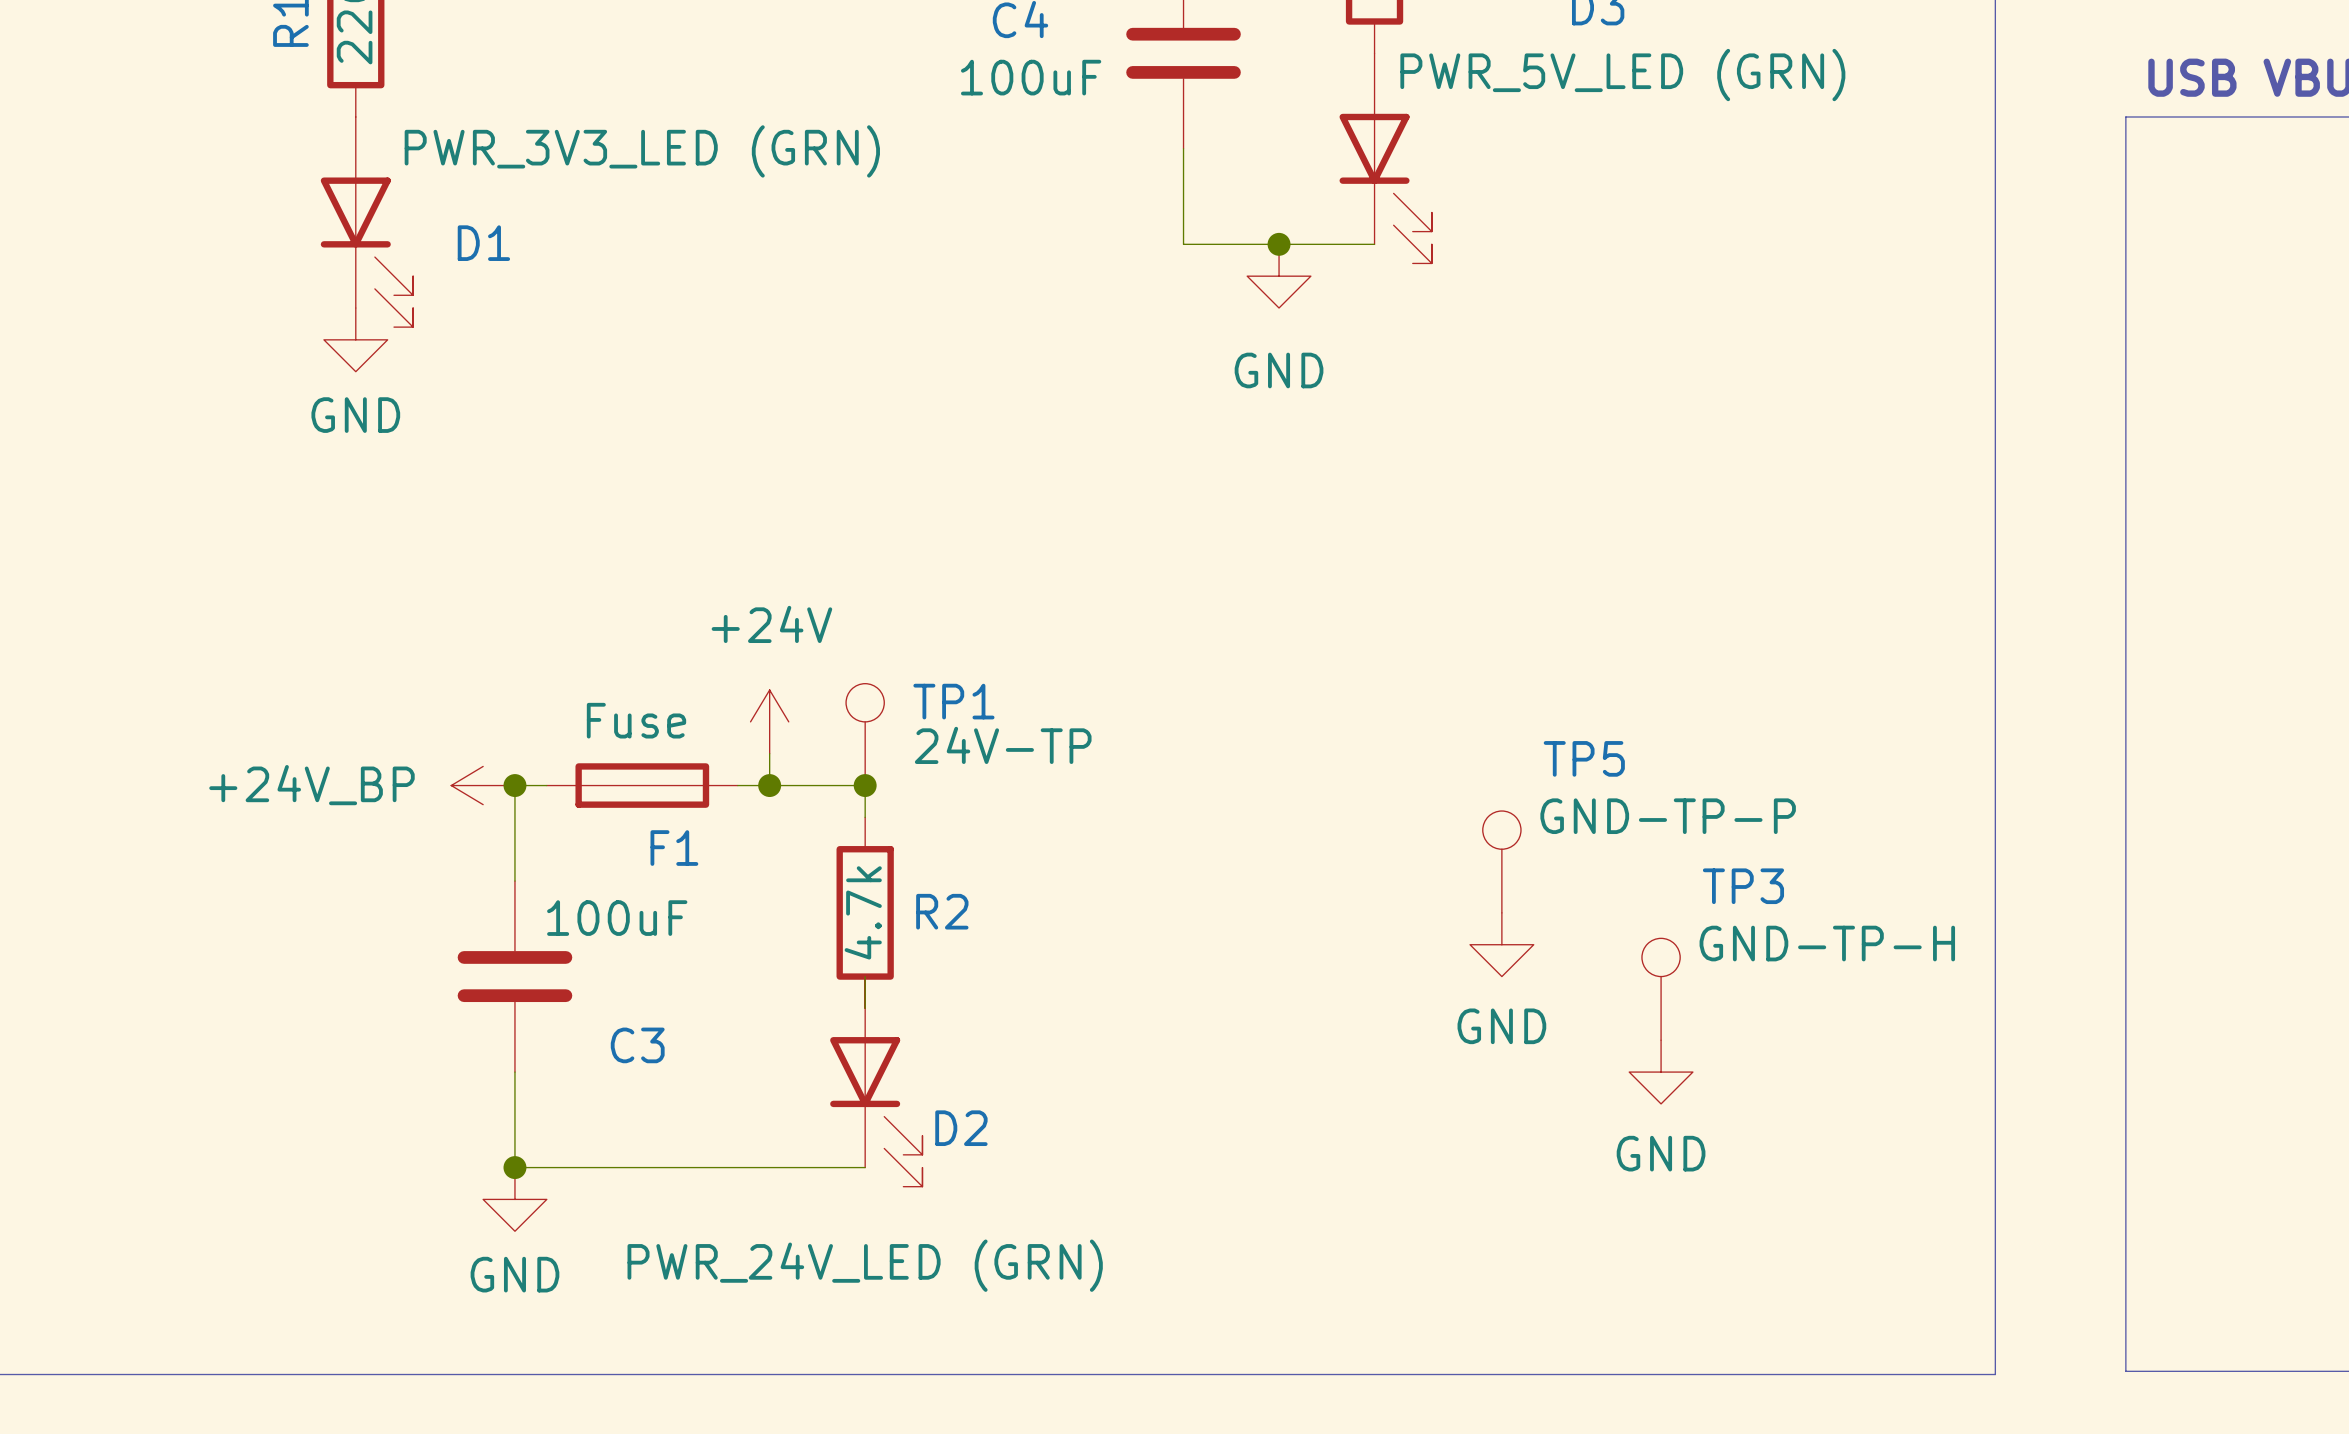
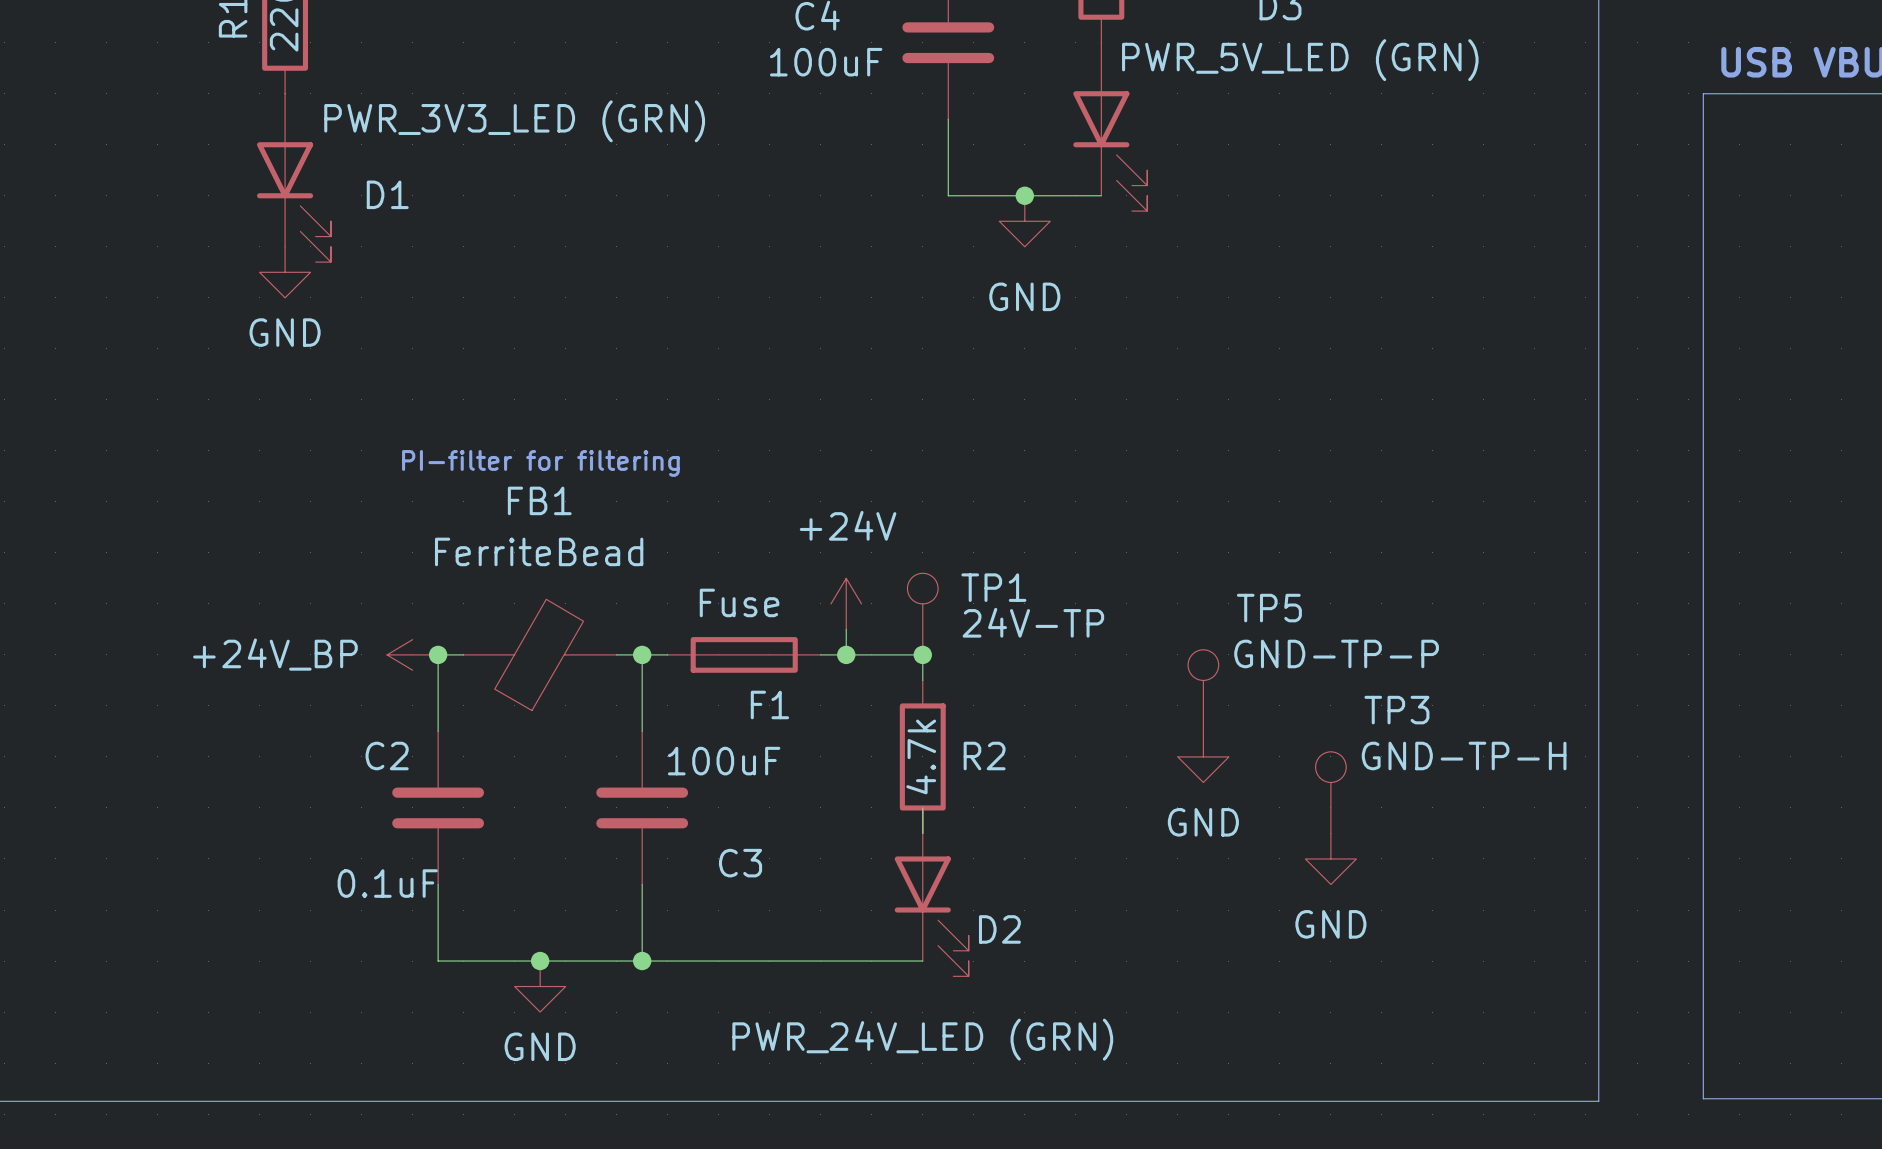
text: none -> PI-filter for filtering (540, 463)
power symbol position: +24V (769, 721) -> +24V (846, 603)
TP1 position: (865, 734) -> (922, 614)
wire: (769, 753) (769, 785) -> (846, 629) (846, 654)
power symbol position: +24V_BP (483, 785) -> +24V_BP (412, 654)
junction position: (514, 785) -> (438, 654)
wire: (546, 785) (514, 785) (514, 881) -> (463, 654) (438, 654) (438, 731)
F1 position: (642, 785) -> (744, 654)
wire: (737, 785) (865, 785) (865, 817) -> (820, 654) (922, 654) (922, 680)
junction: (769, 785) -> none
junction: (865, 785) -> none
FB1: none -> FerriteBead (540, 654)
wire: none -> (616, 654) (667, 654)
wire: none -> (642, 654) (642, 731)
junction: none -> (642, 654)
junction: none -> (846, 654)
junction: none -> (922, 654)
R2 position: (865, 912) -> (922, 756)
C3 position: (514, 976) -> (642, 807)
wire: (865, 976) (865, 1008) -> (922, 807) (922, 833)
C2: none -> 0.1uF (438, 807)
wire: (514, 1072) (514, 1167) (865, 1167) -> none
D2 position: (876, 1081) -> (931, 892)
wire: none -> (438, 884) (438, 961) (922, 961)
wire: none -> (642, 884) (642, 961)
junction: (514, 1167) -> none
power symbol position: GND (514, 1199) -> GND (540, 986)
junction: none -> (540, 961)
junction: none -> (642, 961)

